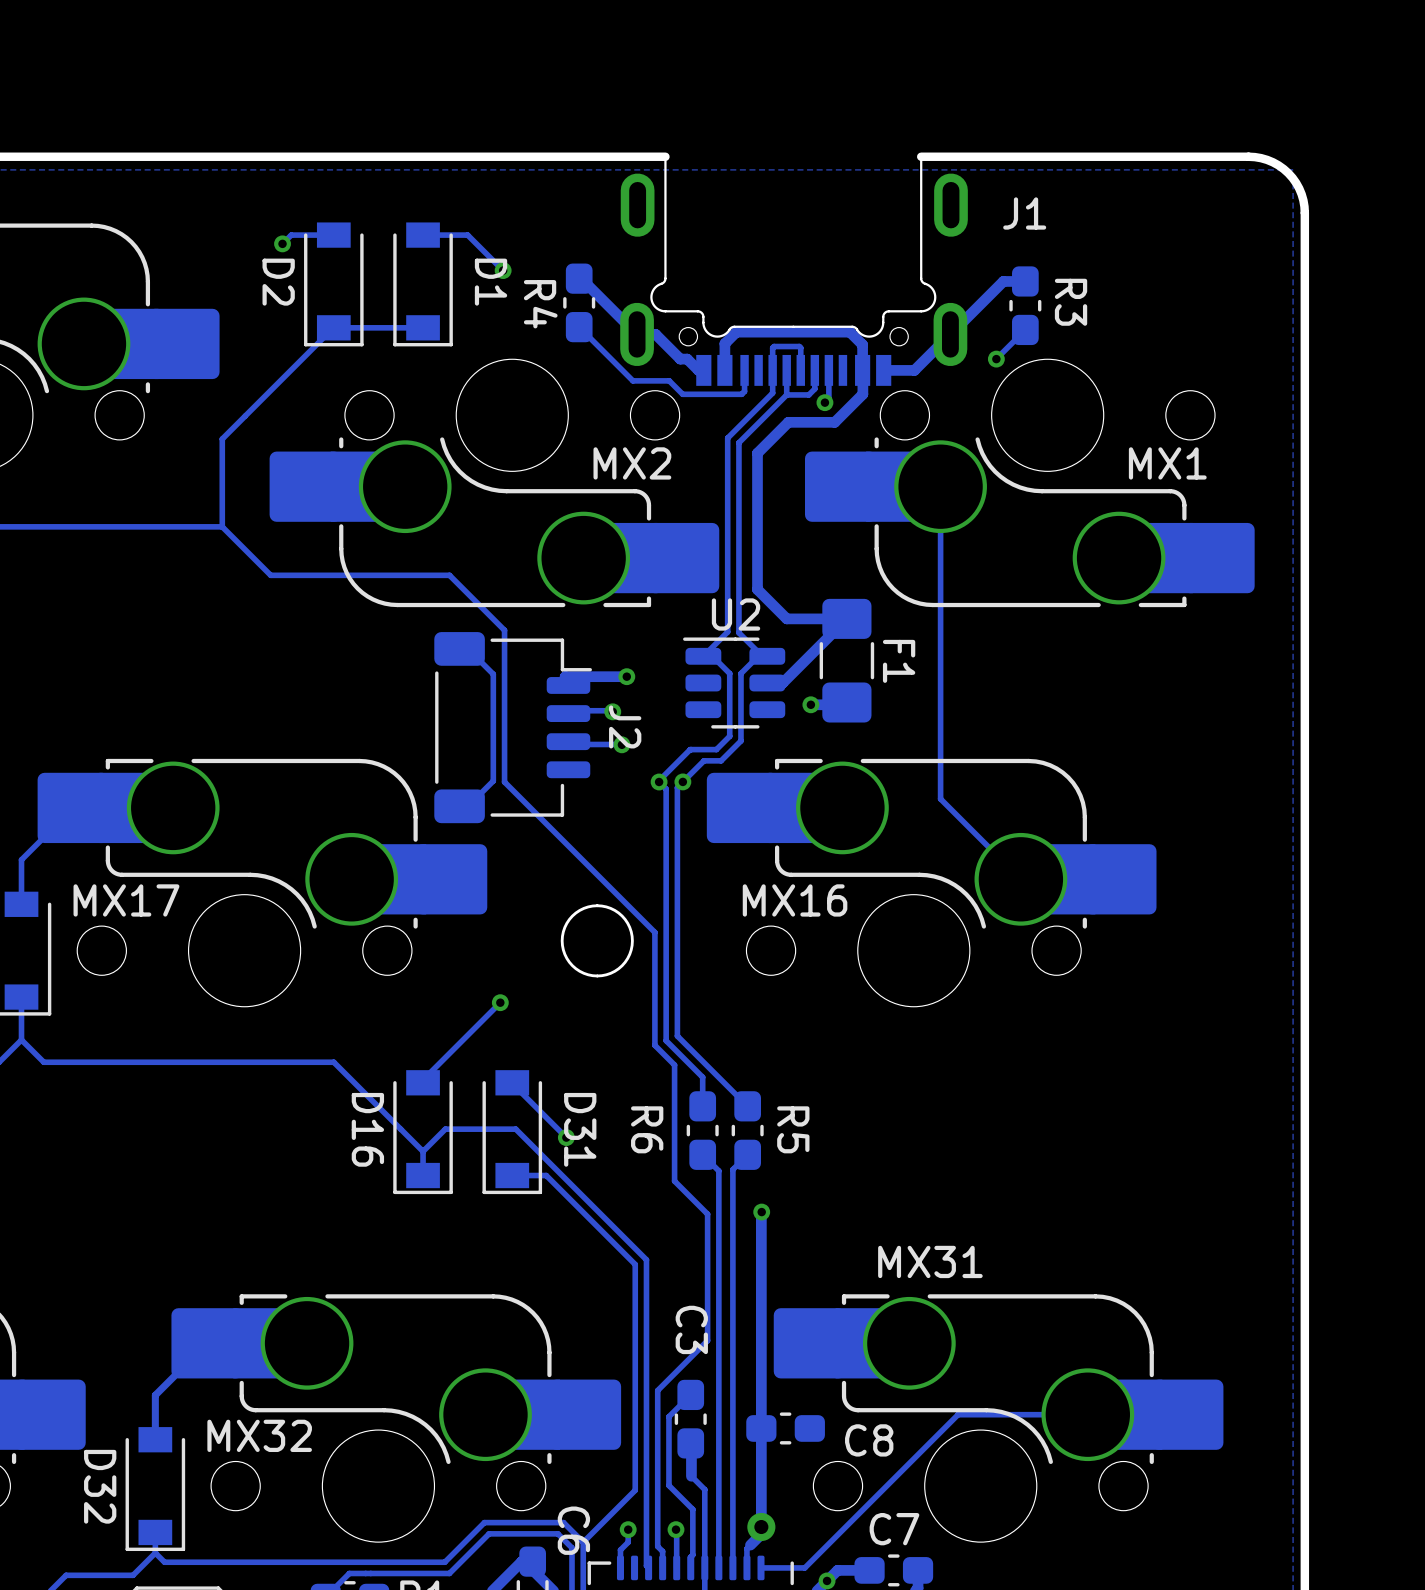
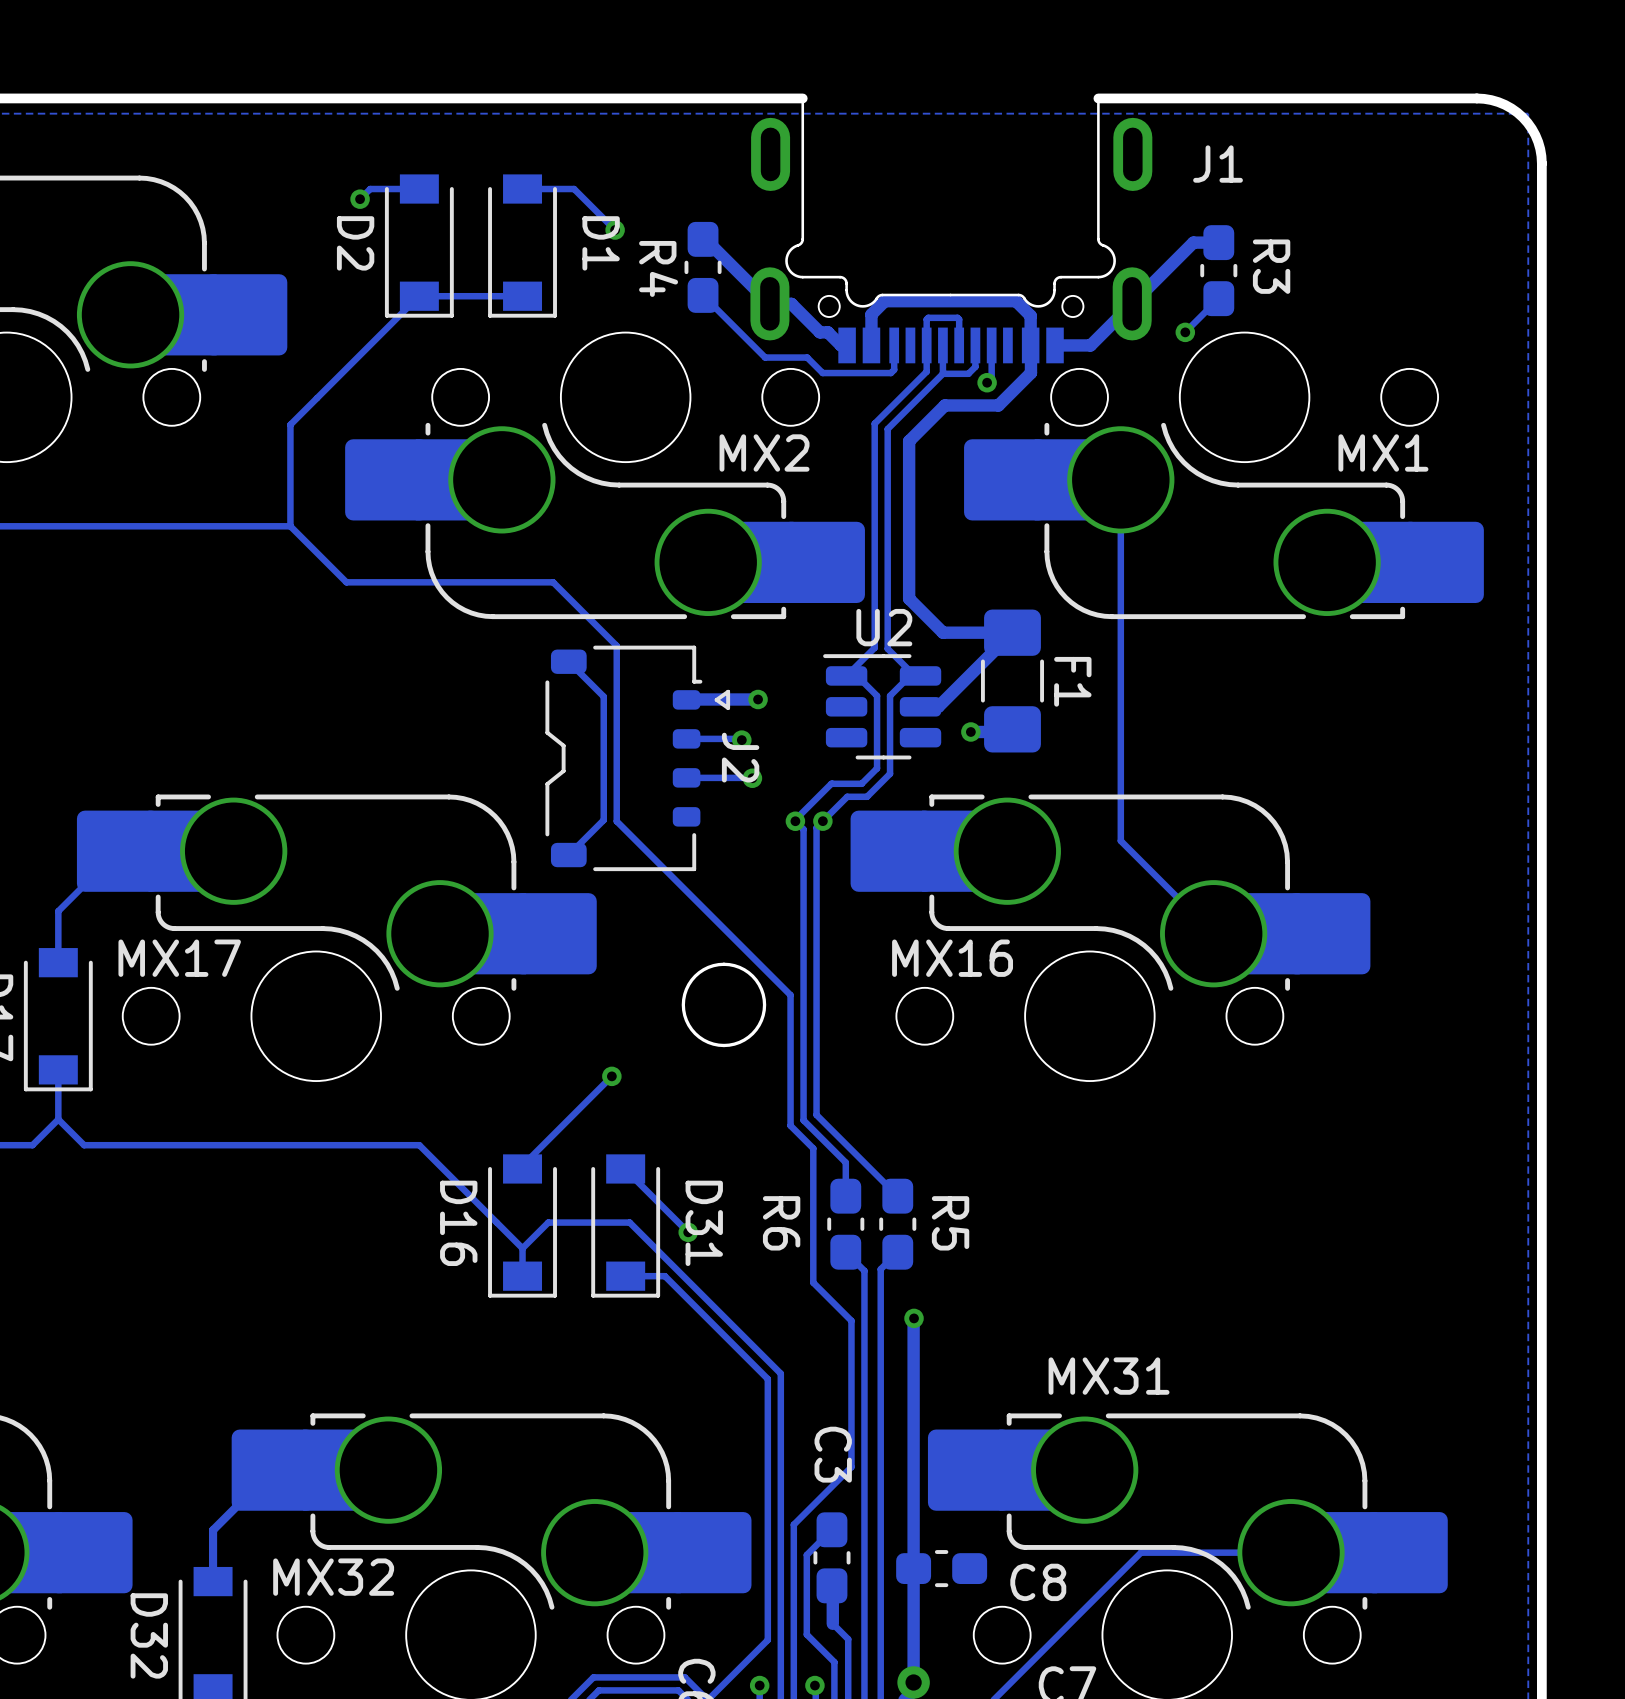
J2 footprint: [434, 632, 592, 824] -> [545, 645, 731, 872]
J2 name position: J2 (625, 726) -> J2 (740, 757)

